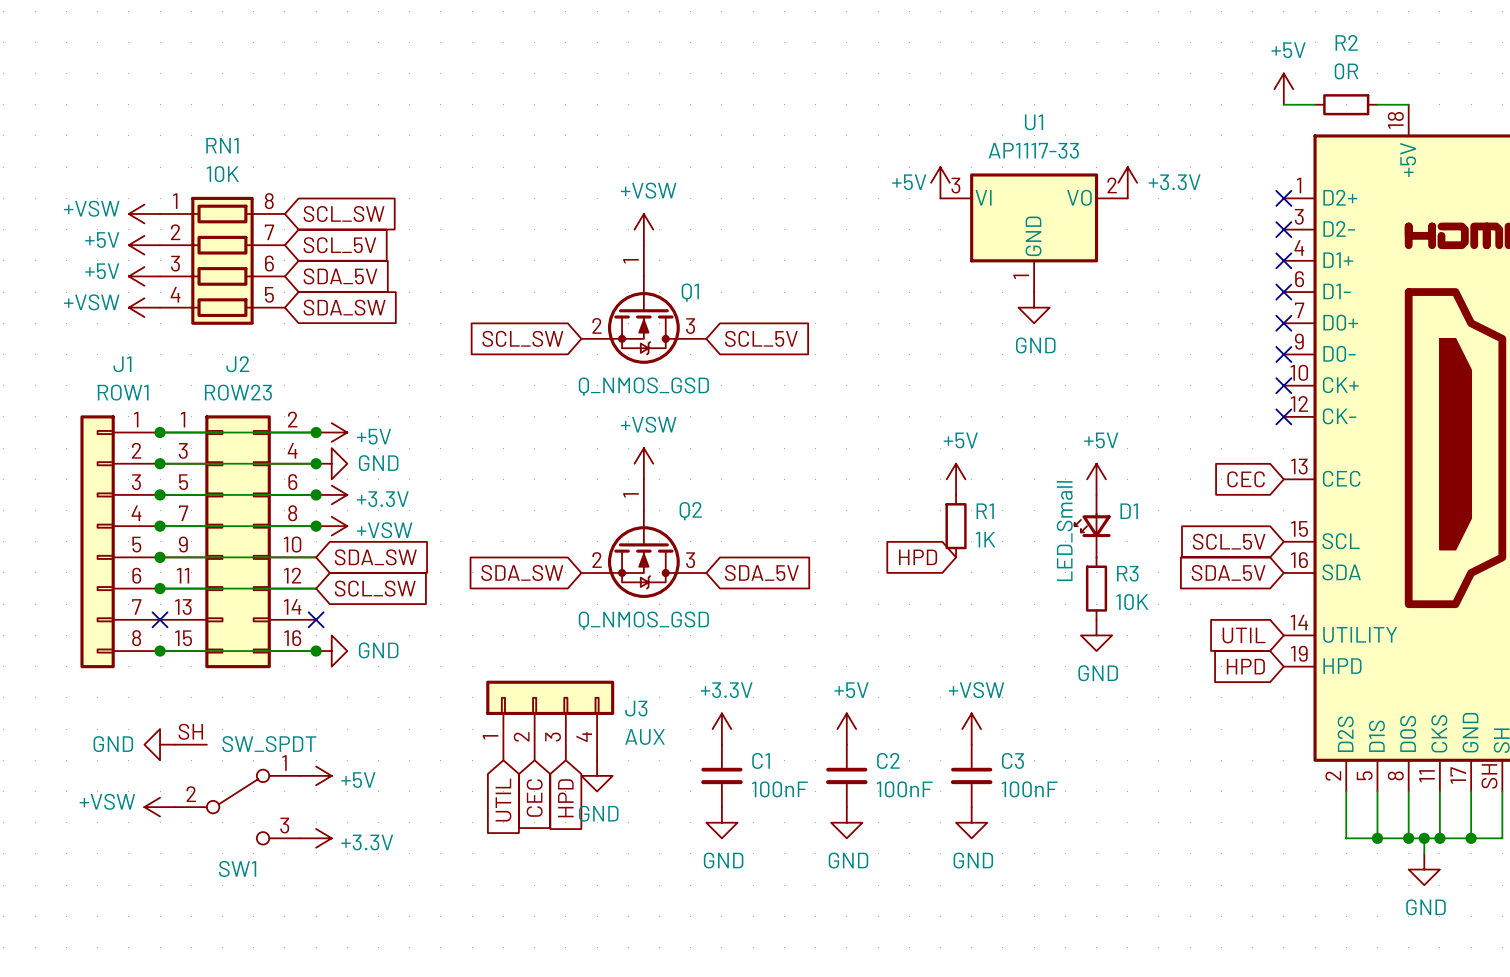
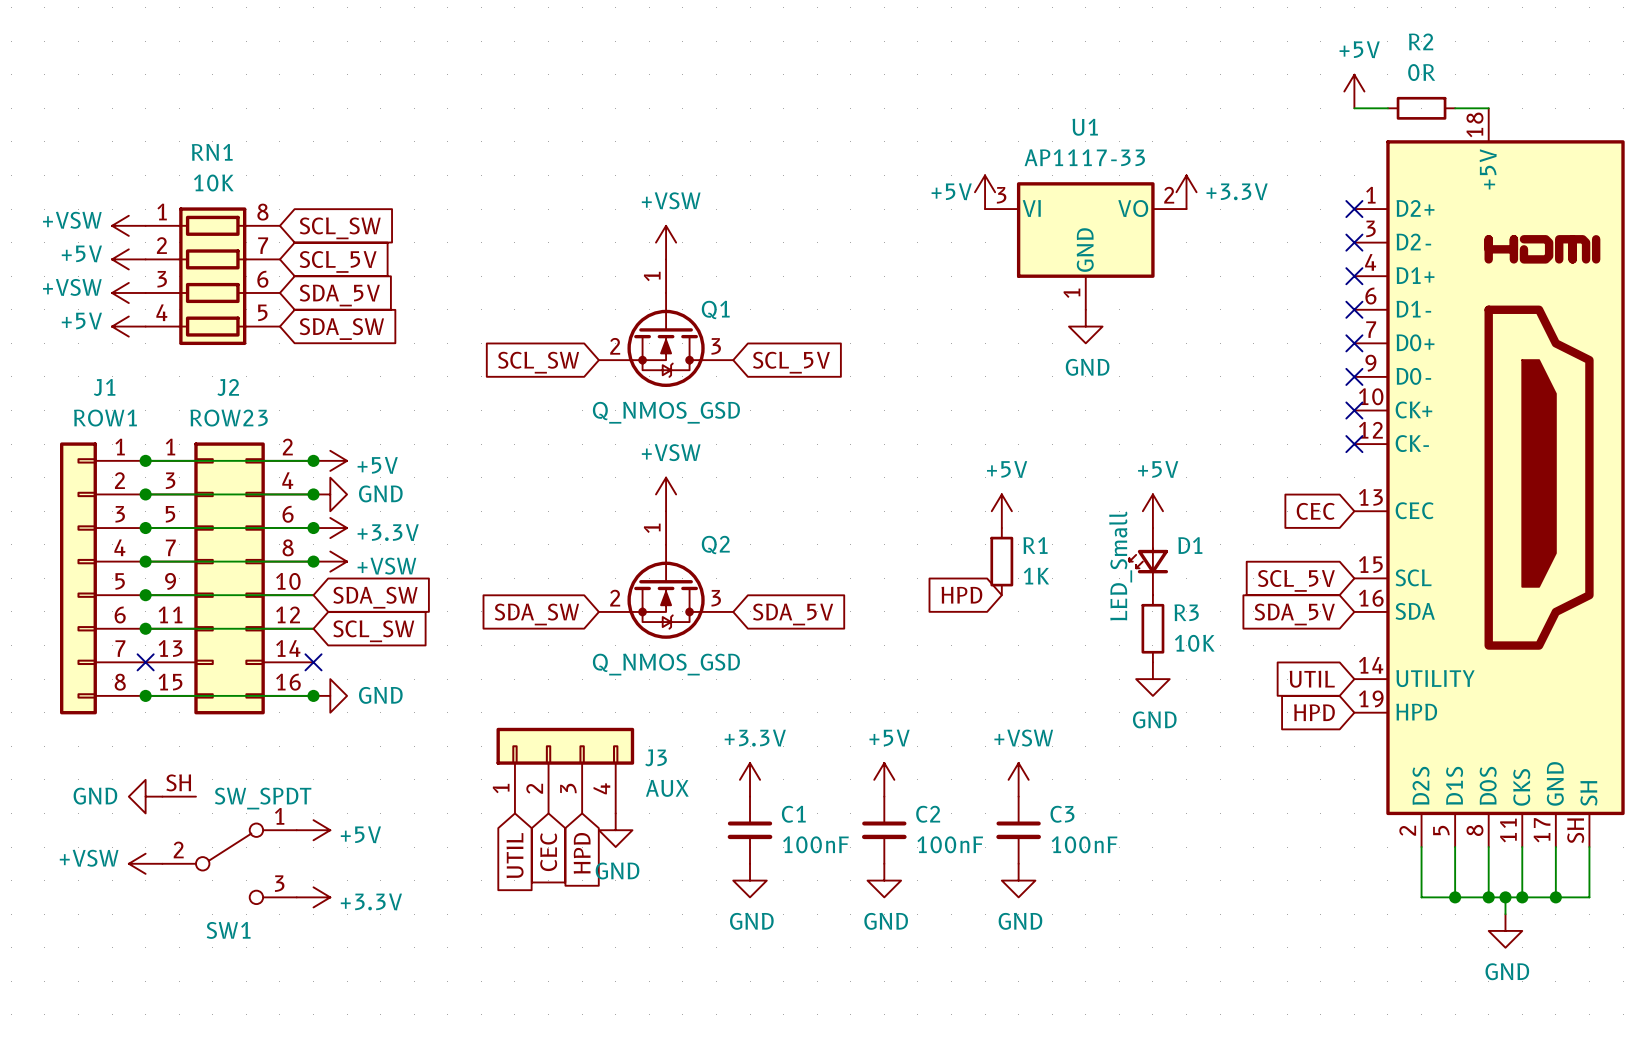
power symbol: +5V (144, 276) -> +VSW (128, 292)
power symbol: +VSW (144, 307) -> +5V (128, 326)

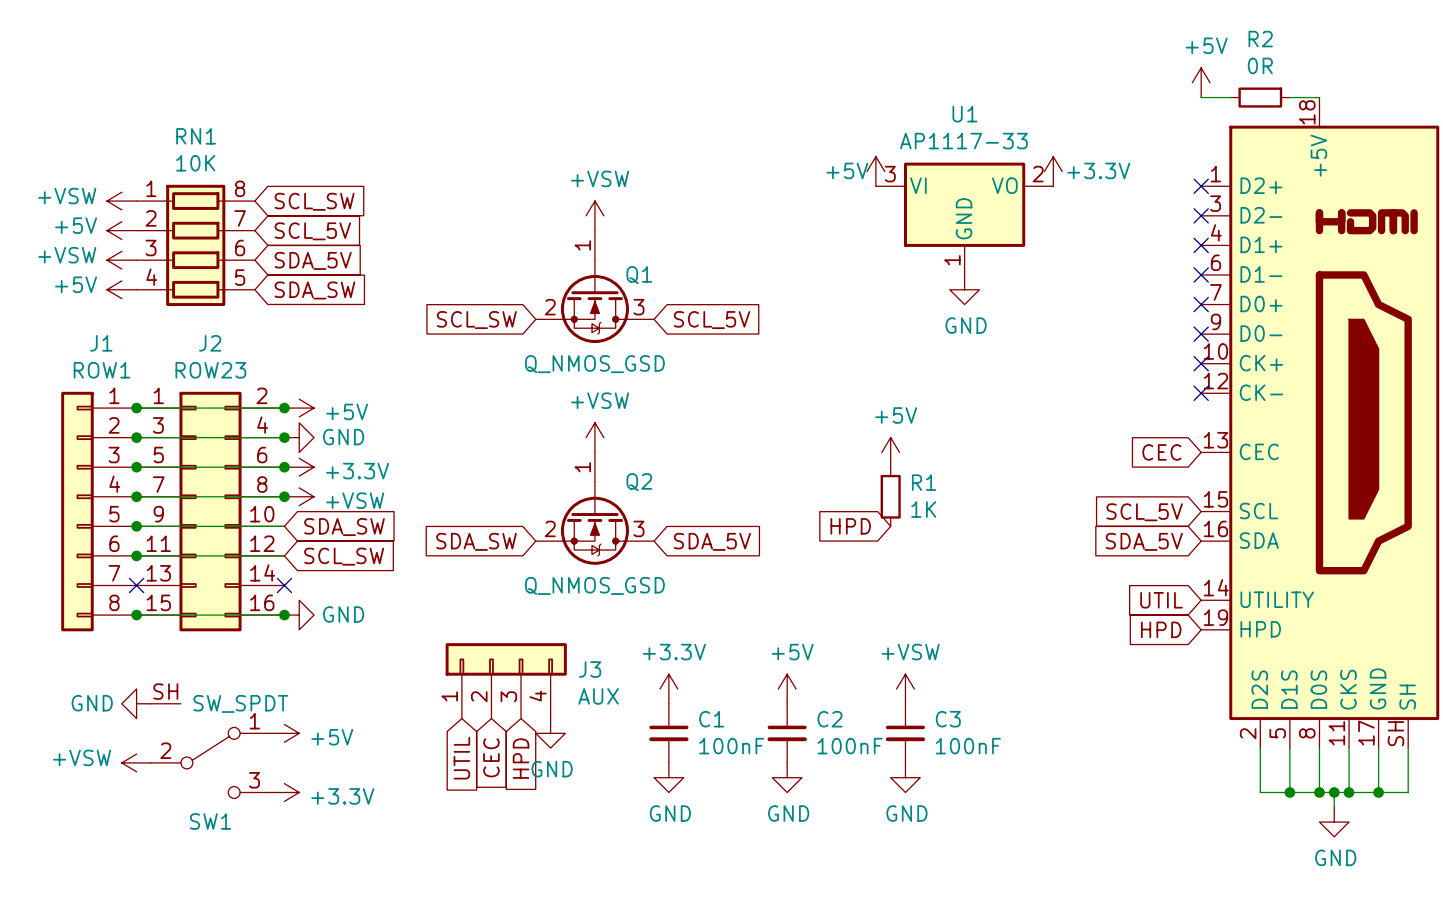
power symbol: +5V (1152, 511) -> none
D1: LED_Small (1148, 561) -> none
R3: 10K (1152, 628) -> none
power symbol: GND (1152, 679) -> none

